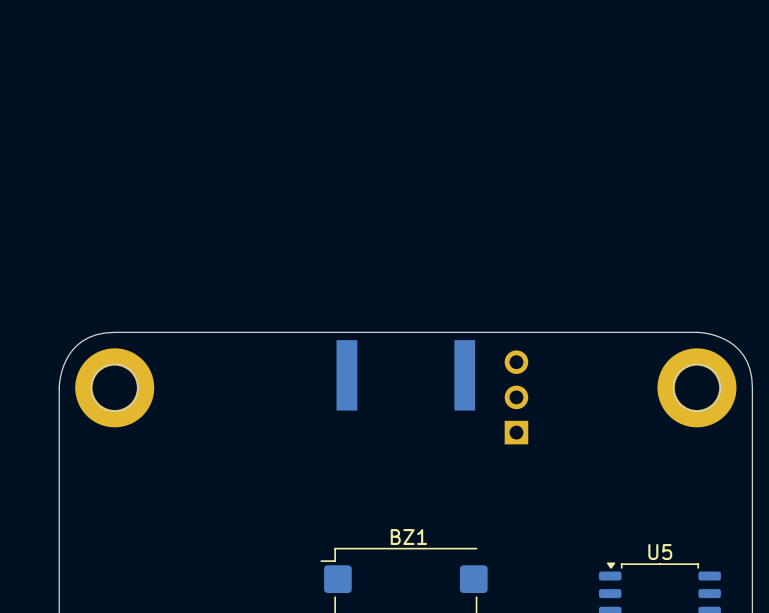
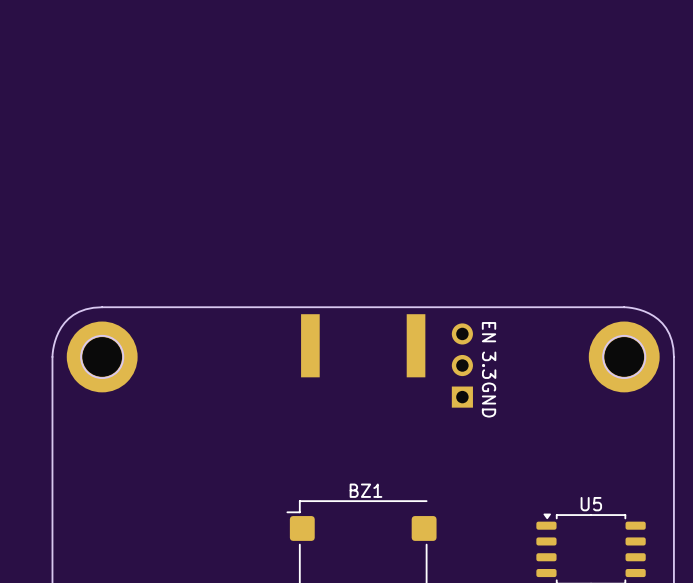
text: none -> EN (489, 332)
text: none -> 3.3 (489, 365)
text: none -> GND (489, 400)

